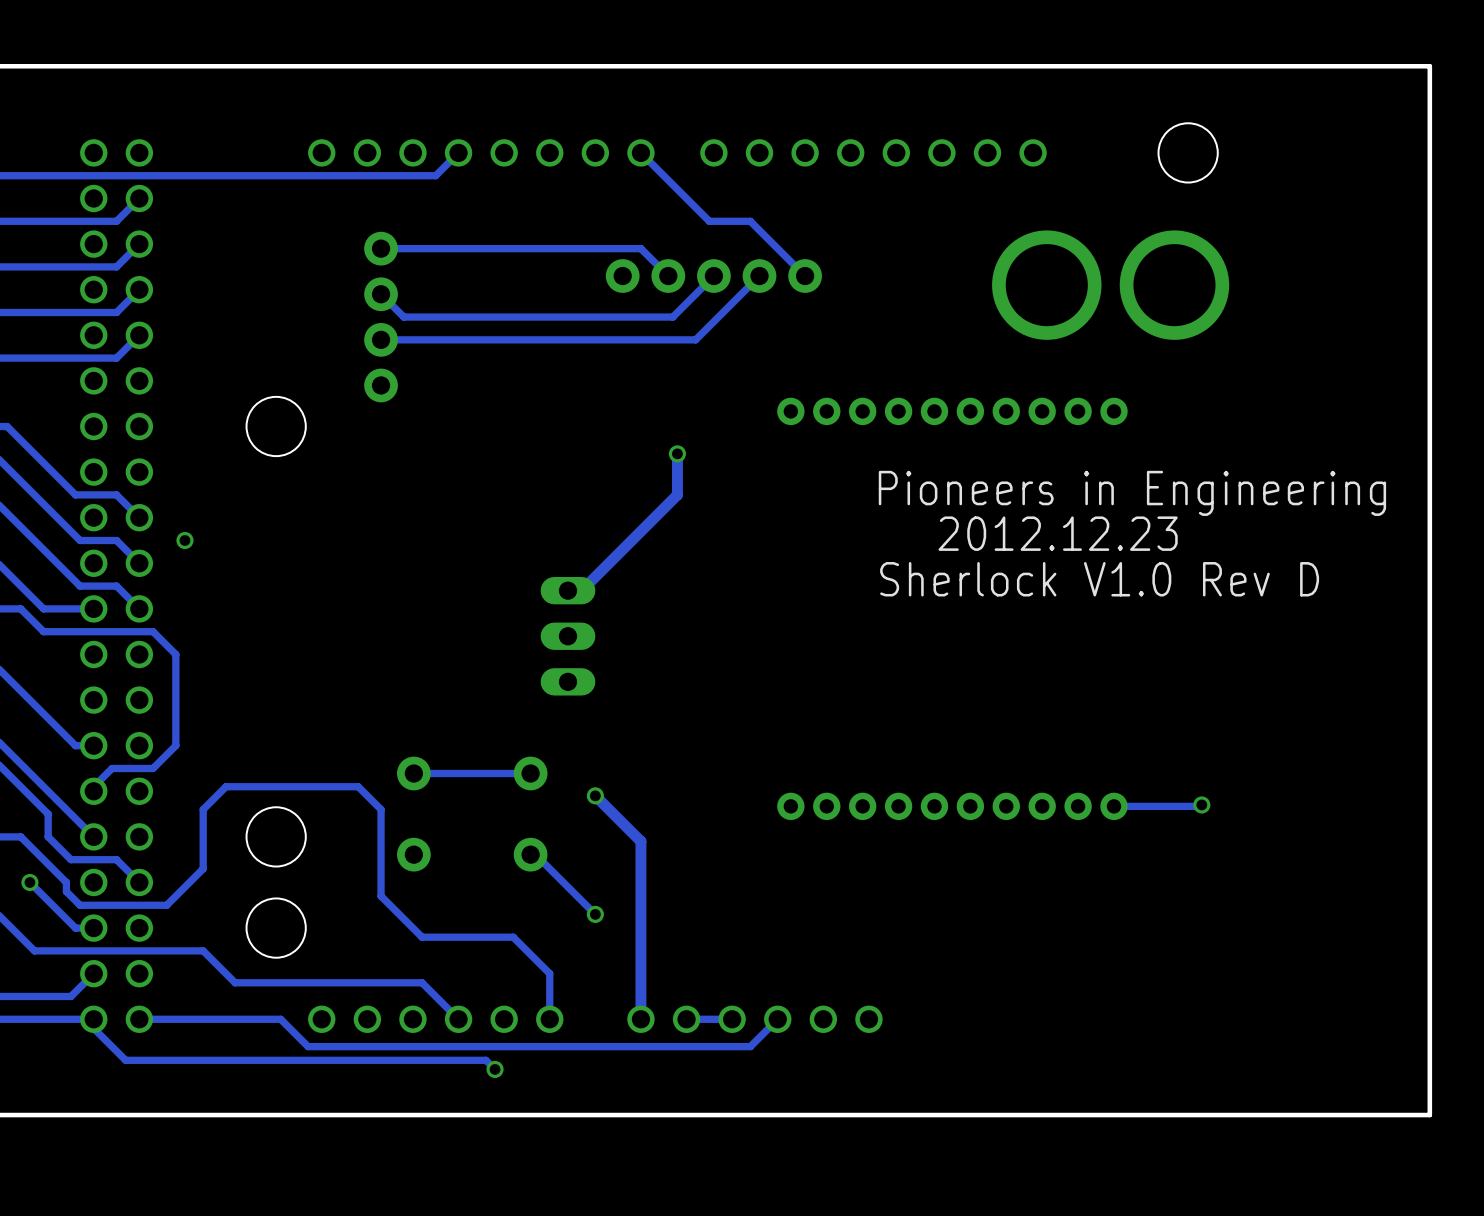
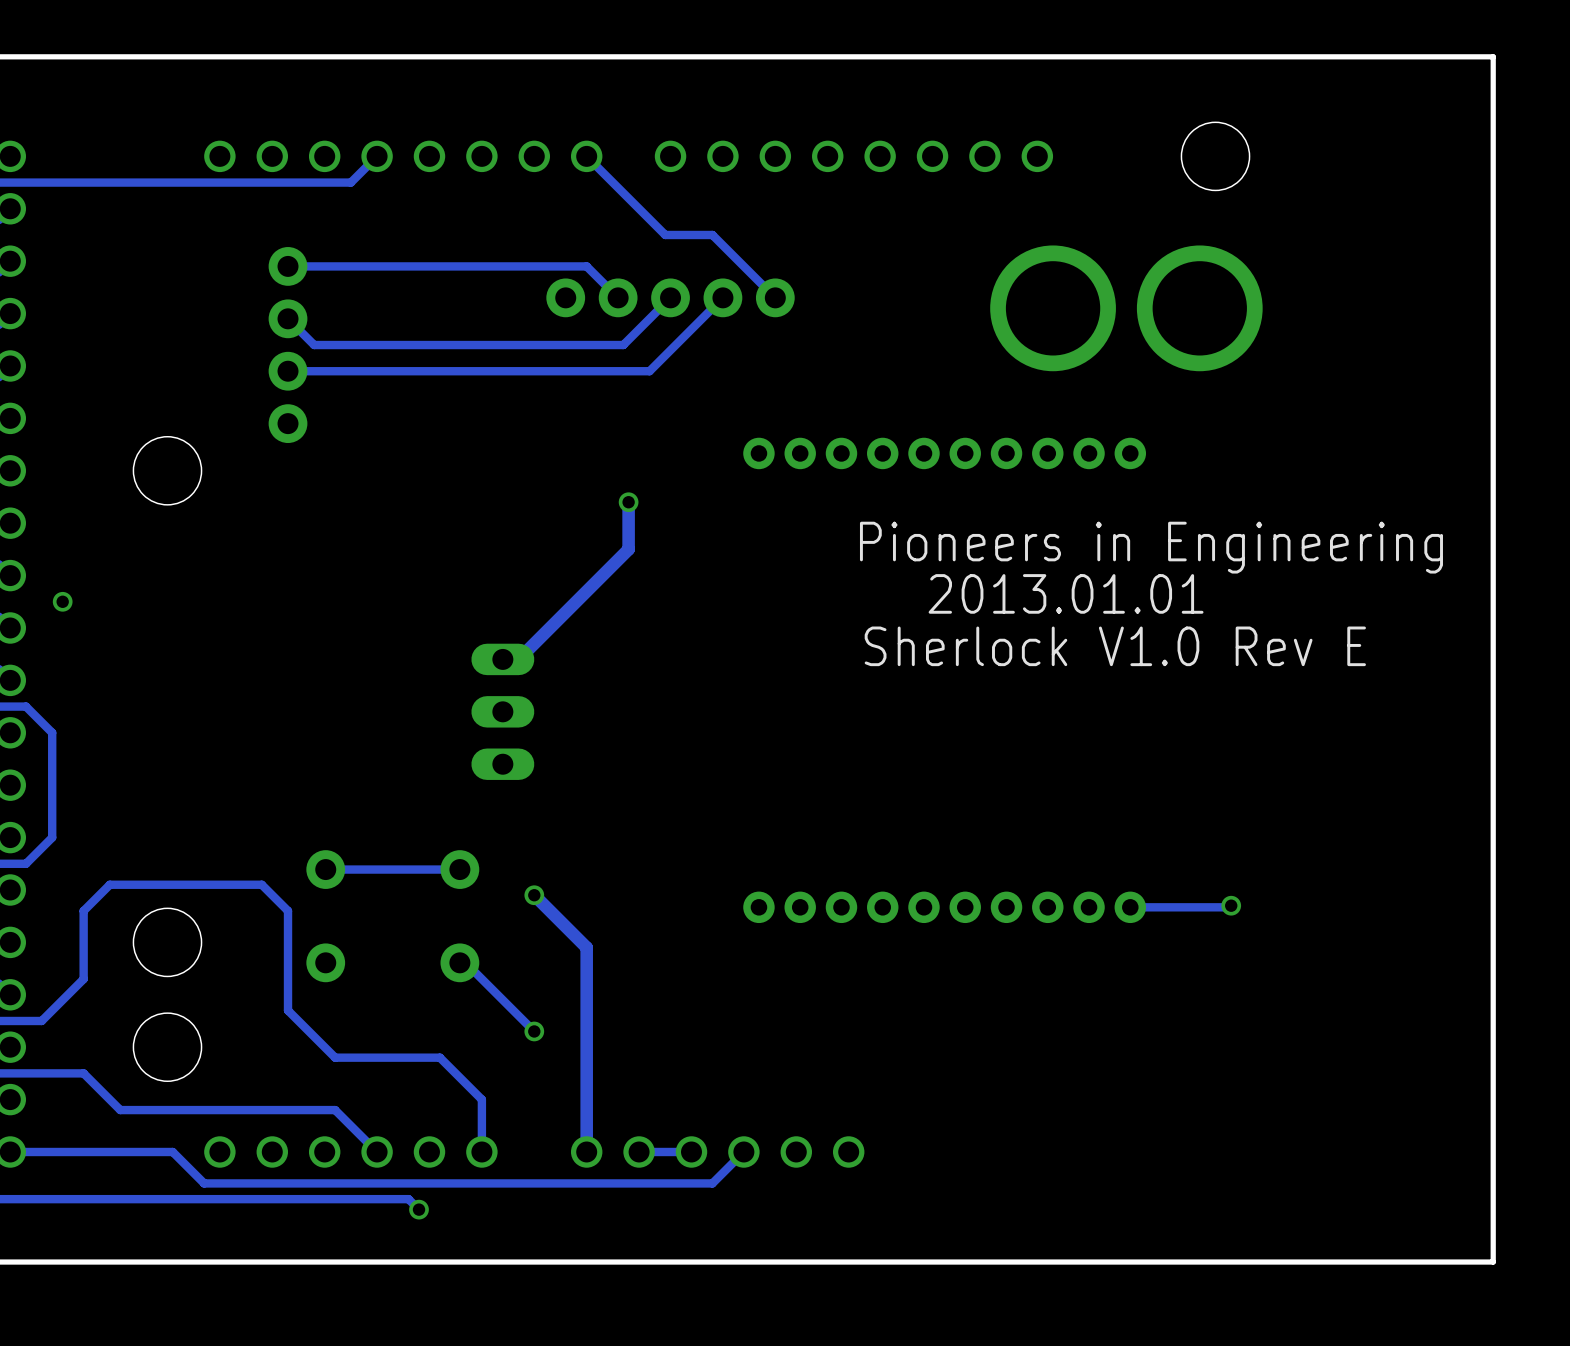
text: 2012.12.23 (1058, 533) -> 2013.01.01 (1066, 593)
text: Sherlock V1.0 Rev D (1099, 579) -> Sherlock V1.0 Rev E (1115, 646)

